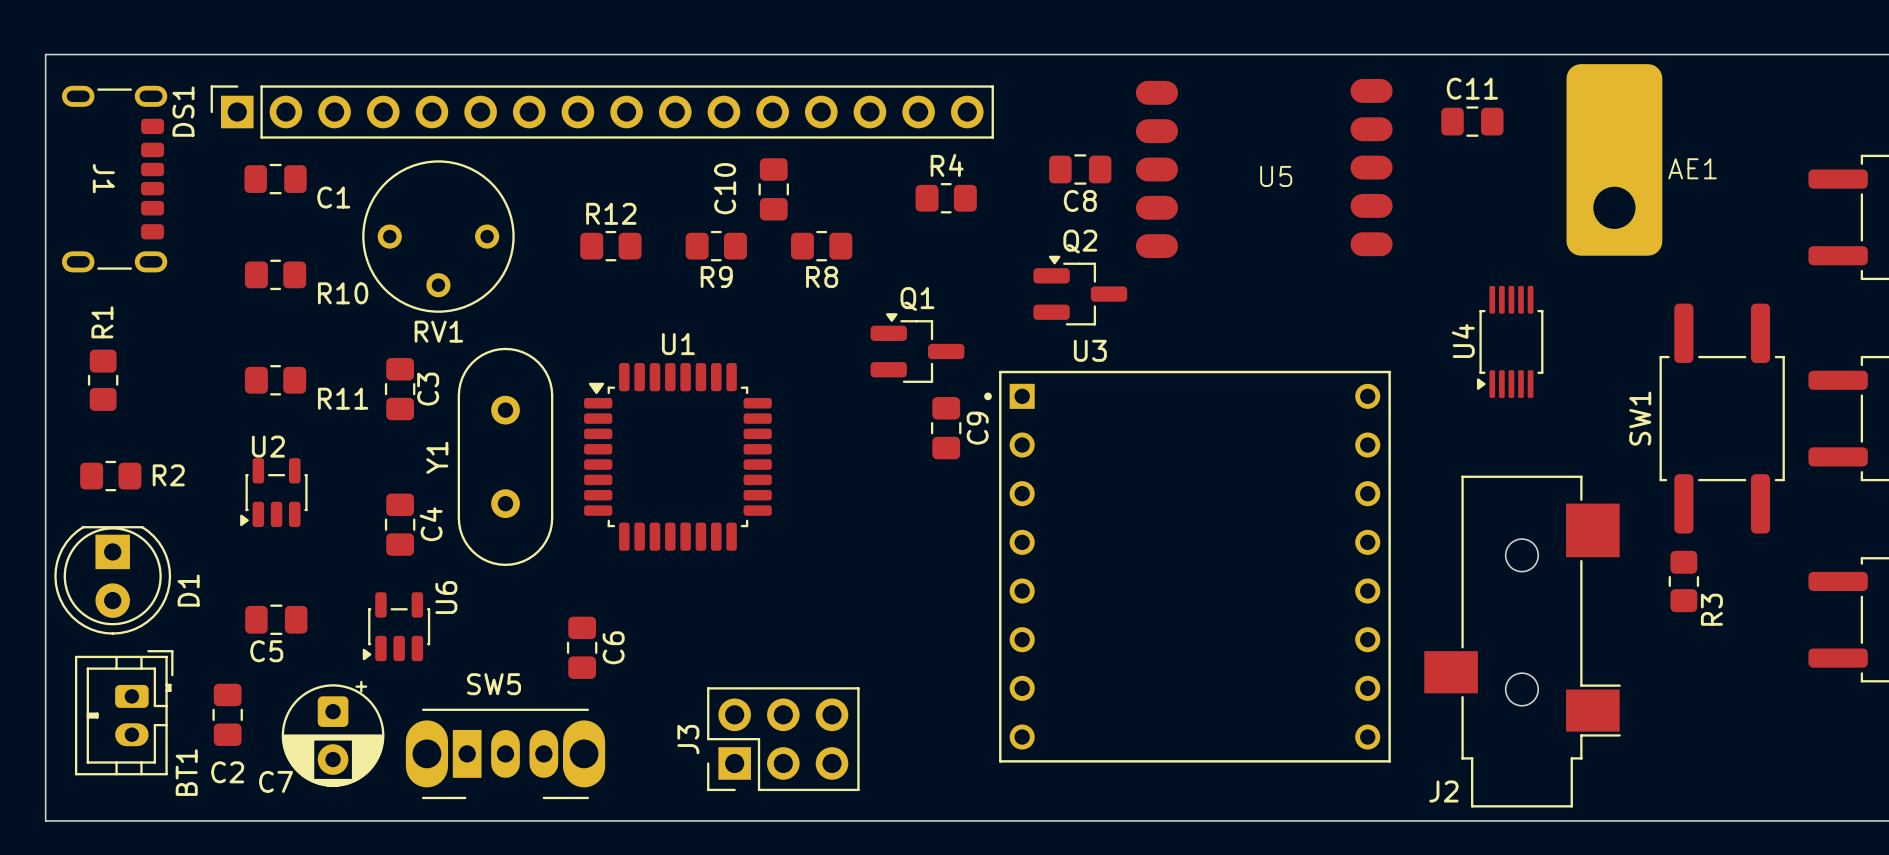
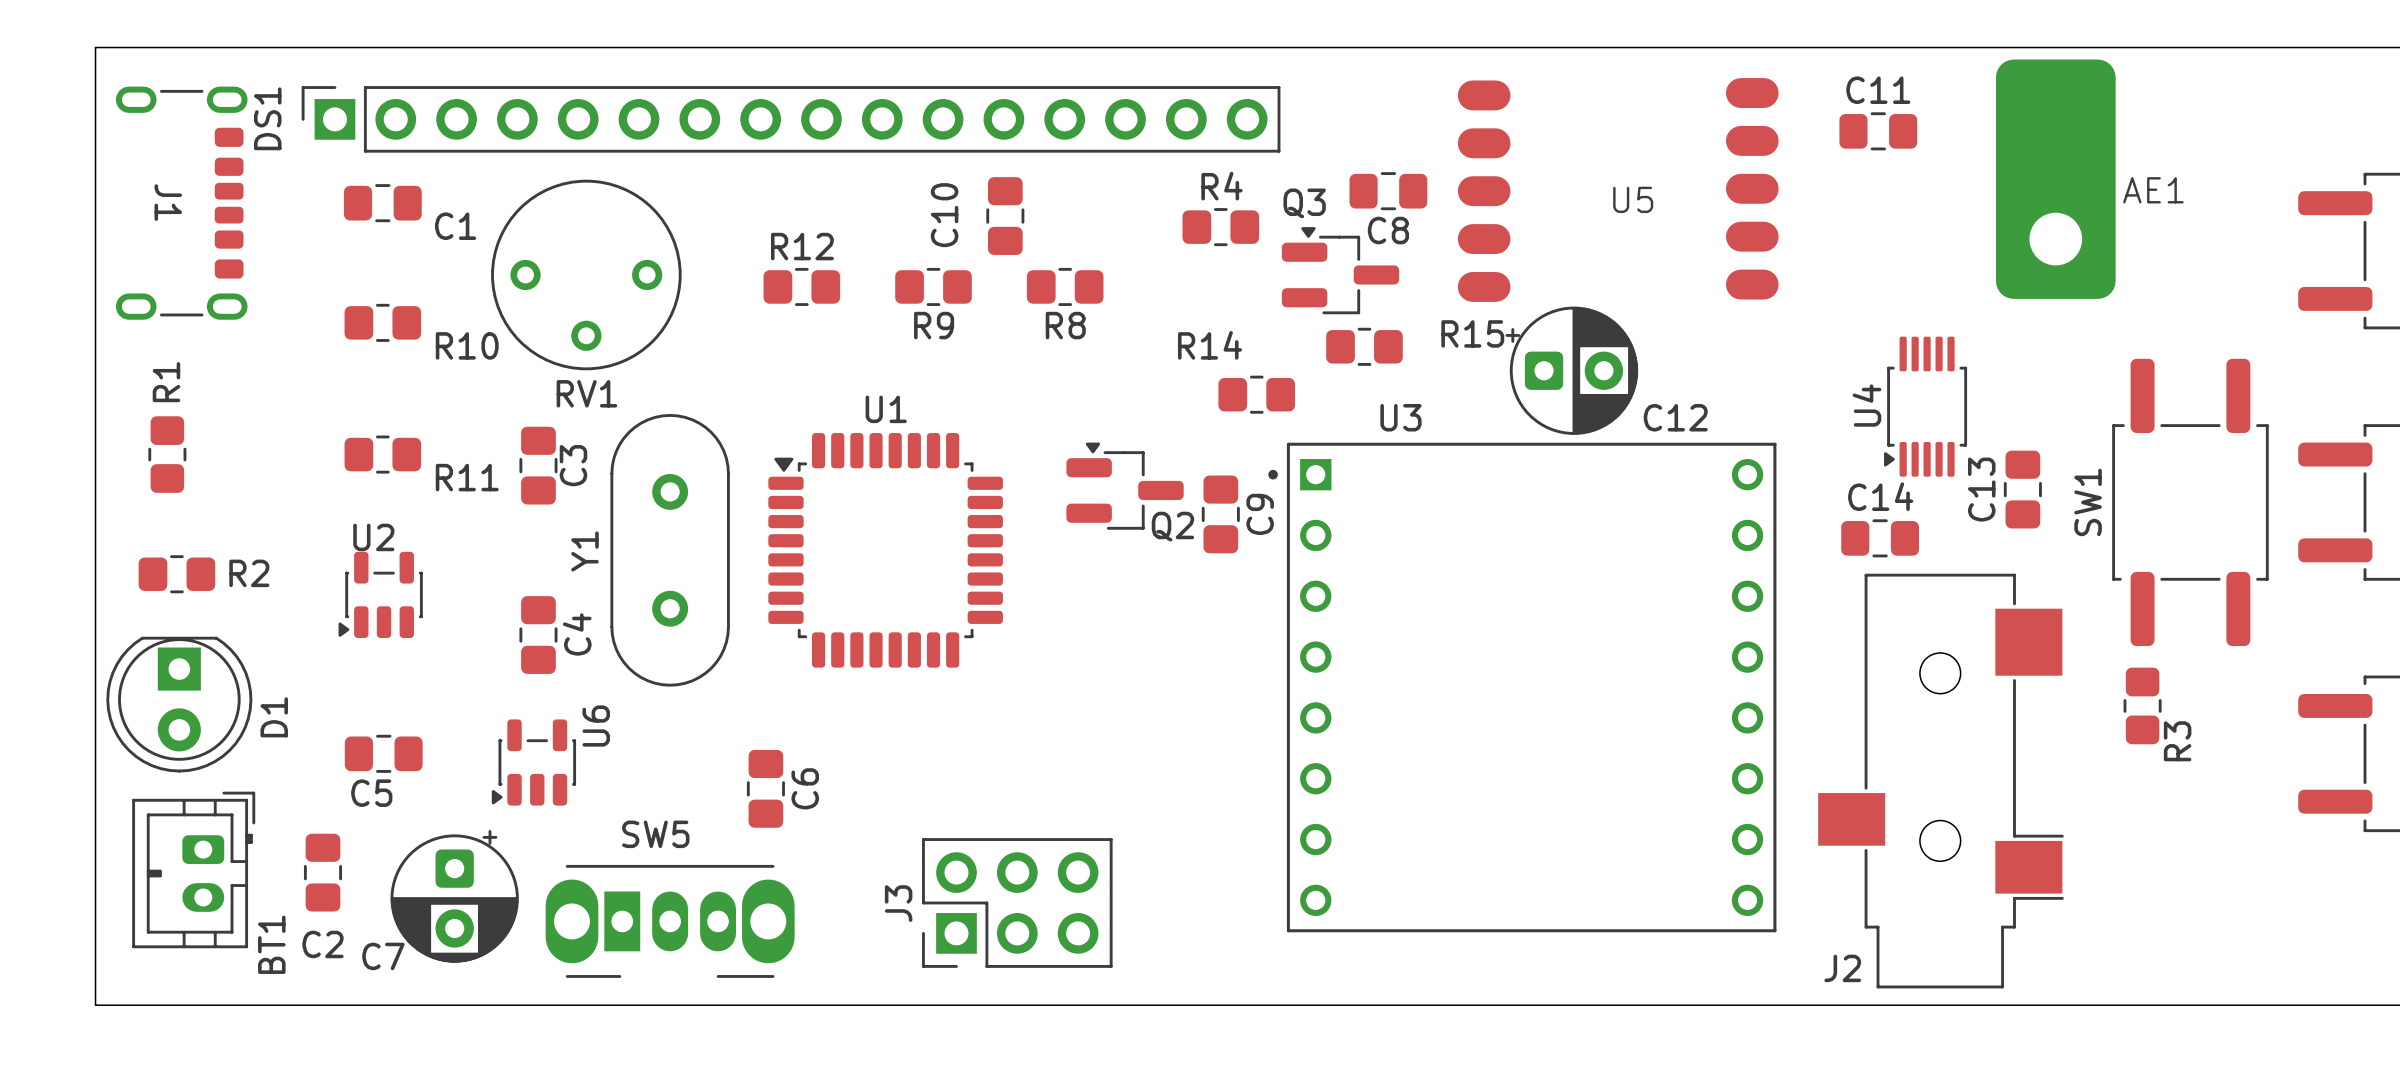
Q3: none -> (1340, 270)
Q2 name position: Q2 (1080, 241) -> Q2 (1172, 526)
Q2 position: (1080, 290) -> (1125, 486)
R15: none -> (1364, 346)
C12: none -> (1571, 370)
R14: none -> (1256, 394)
Q1: (917, 348) -> none
C13: none -> (2022, 489)
C14: none -> (1880, 538)

